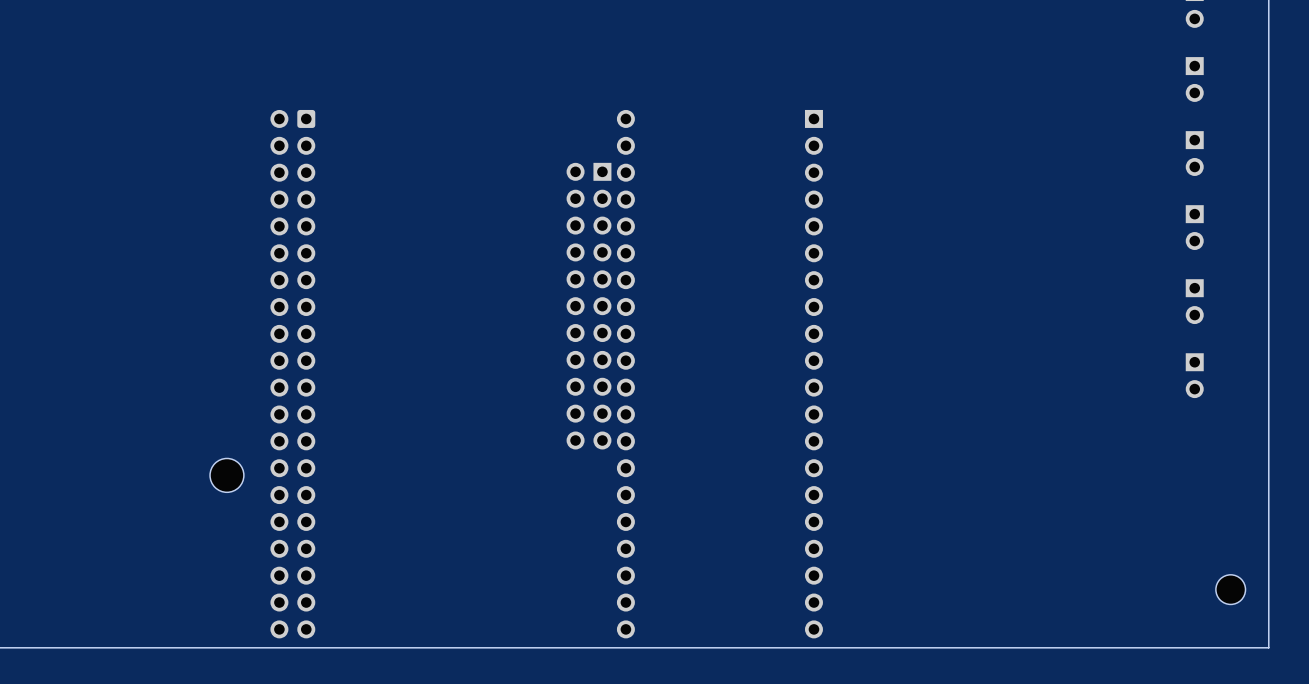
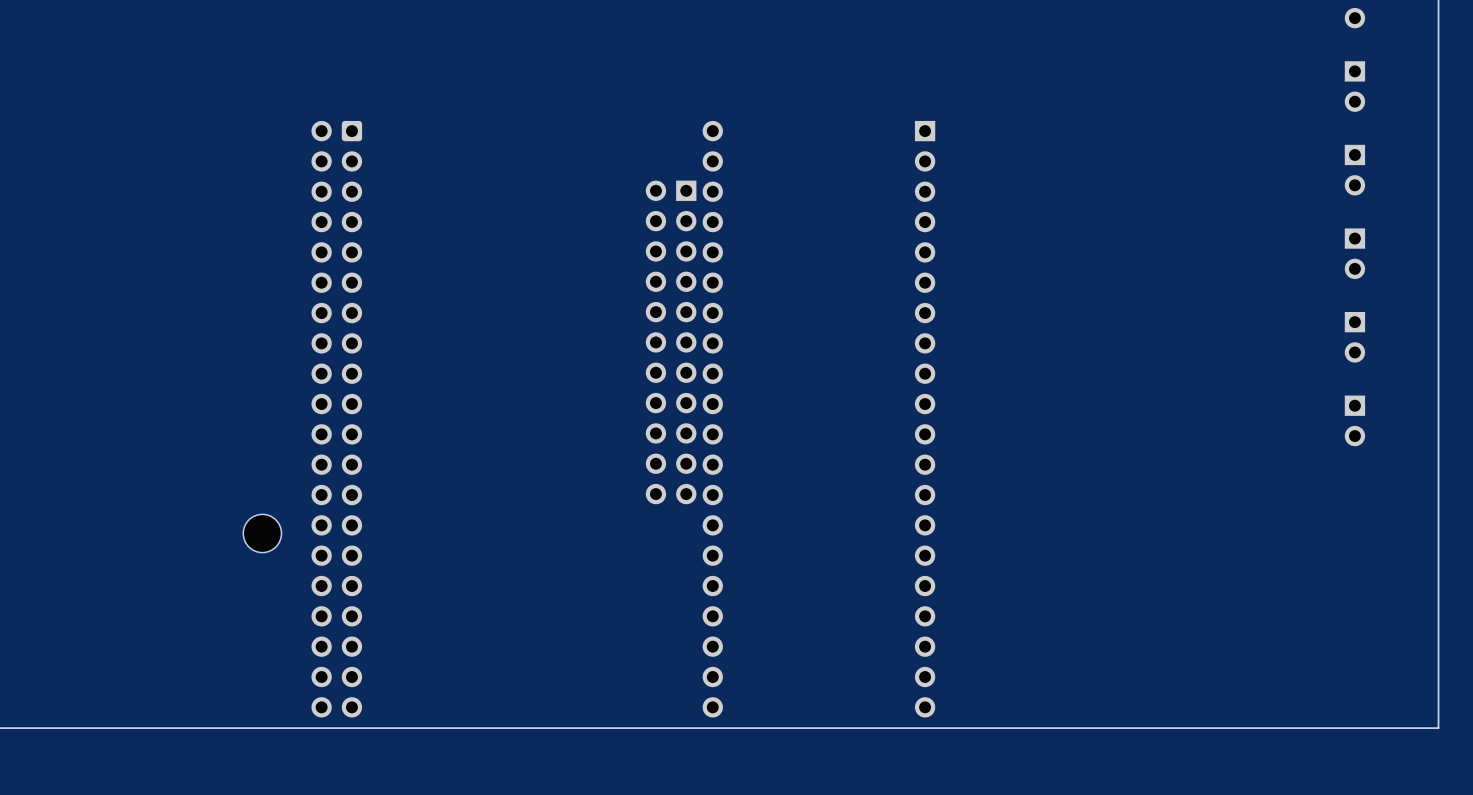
part: (1230, 589) -> none

